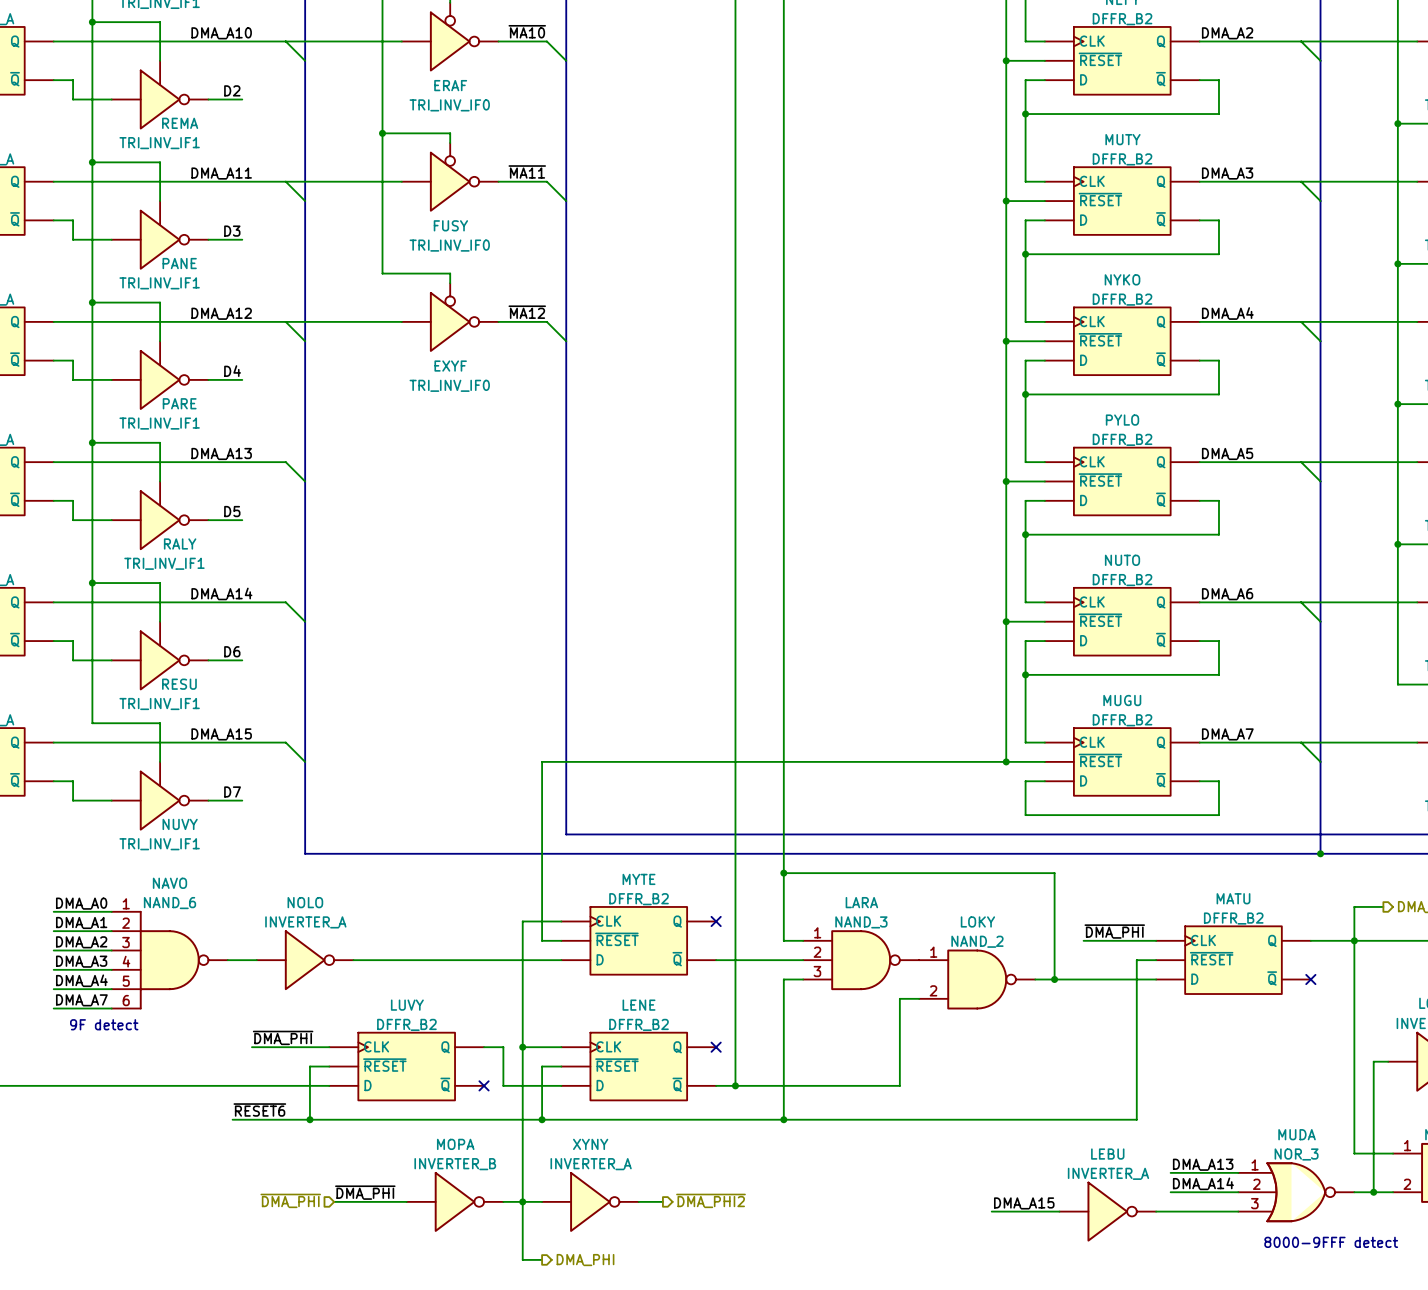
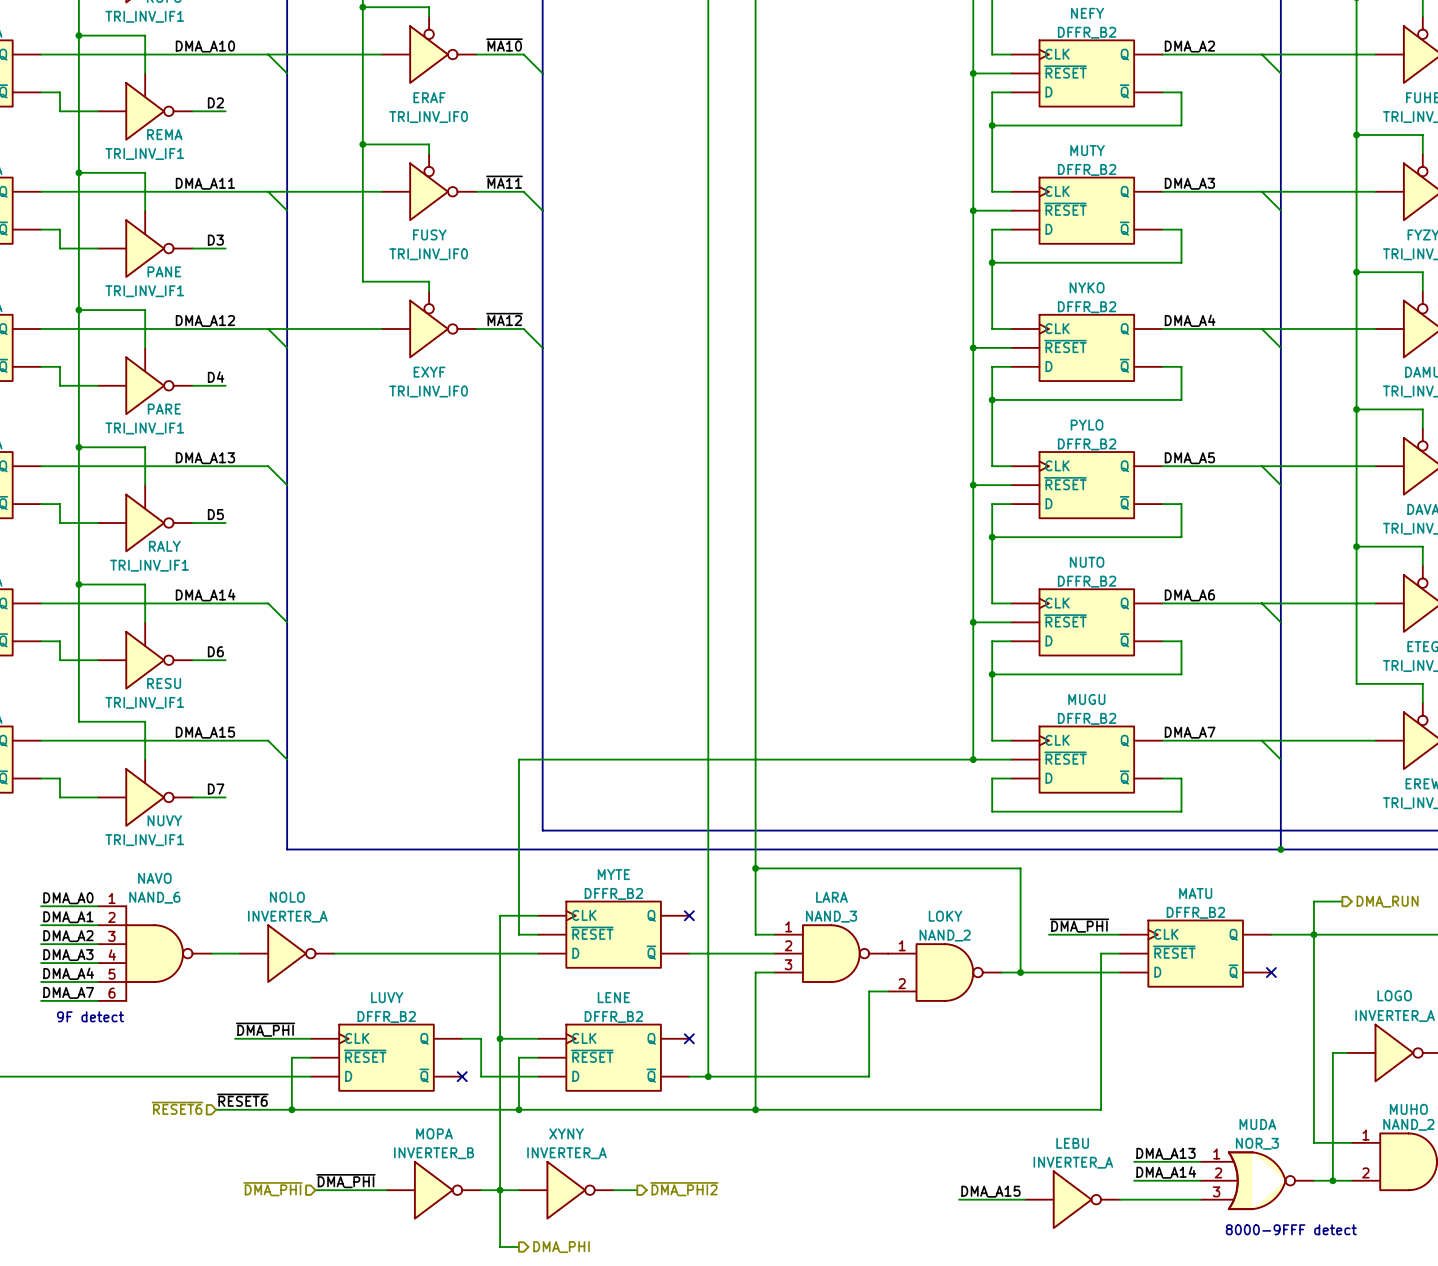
hierarchical label: none -> ~{RESET6} (177, 1108)

